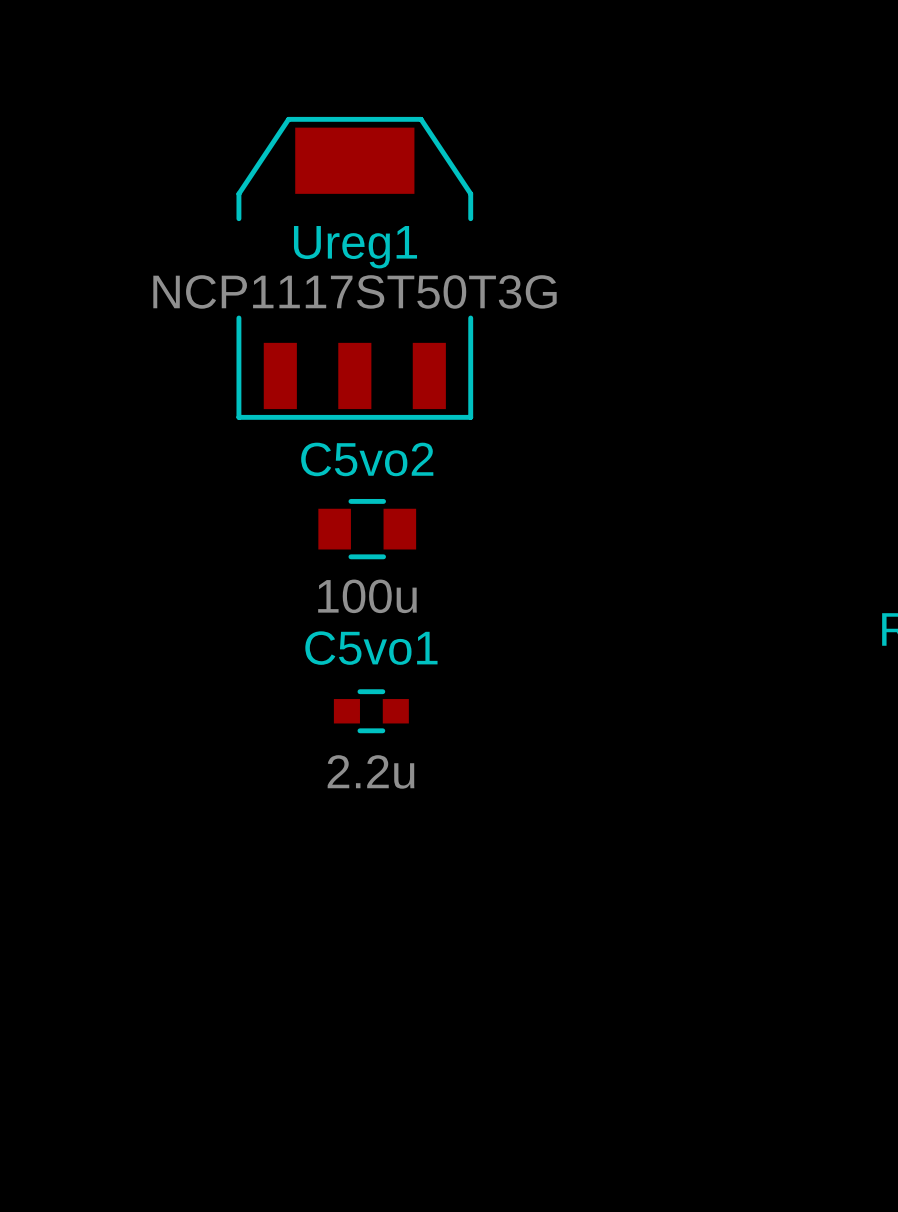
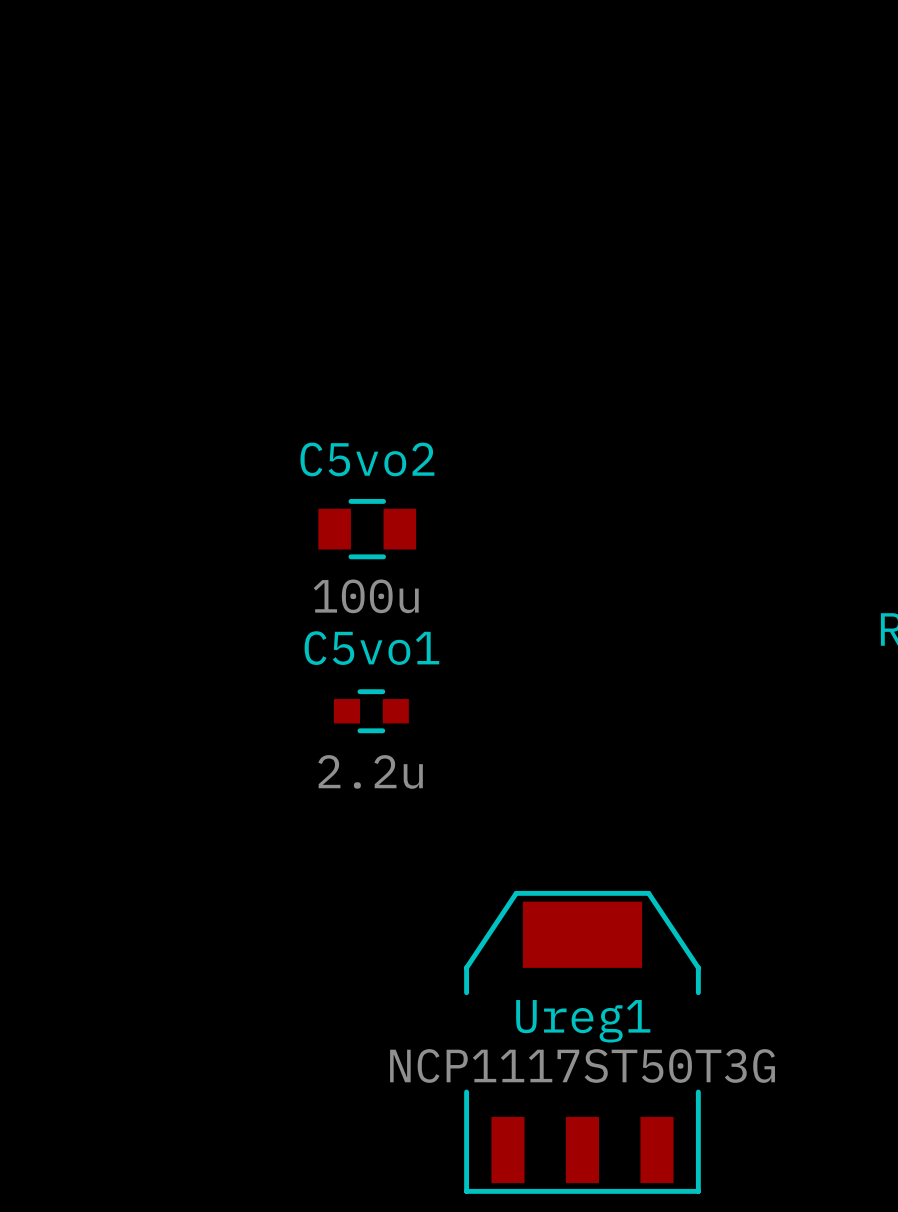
Ureg1 position: (354, 268) -> (582, 1042)

